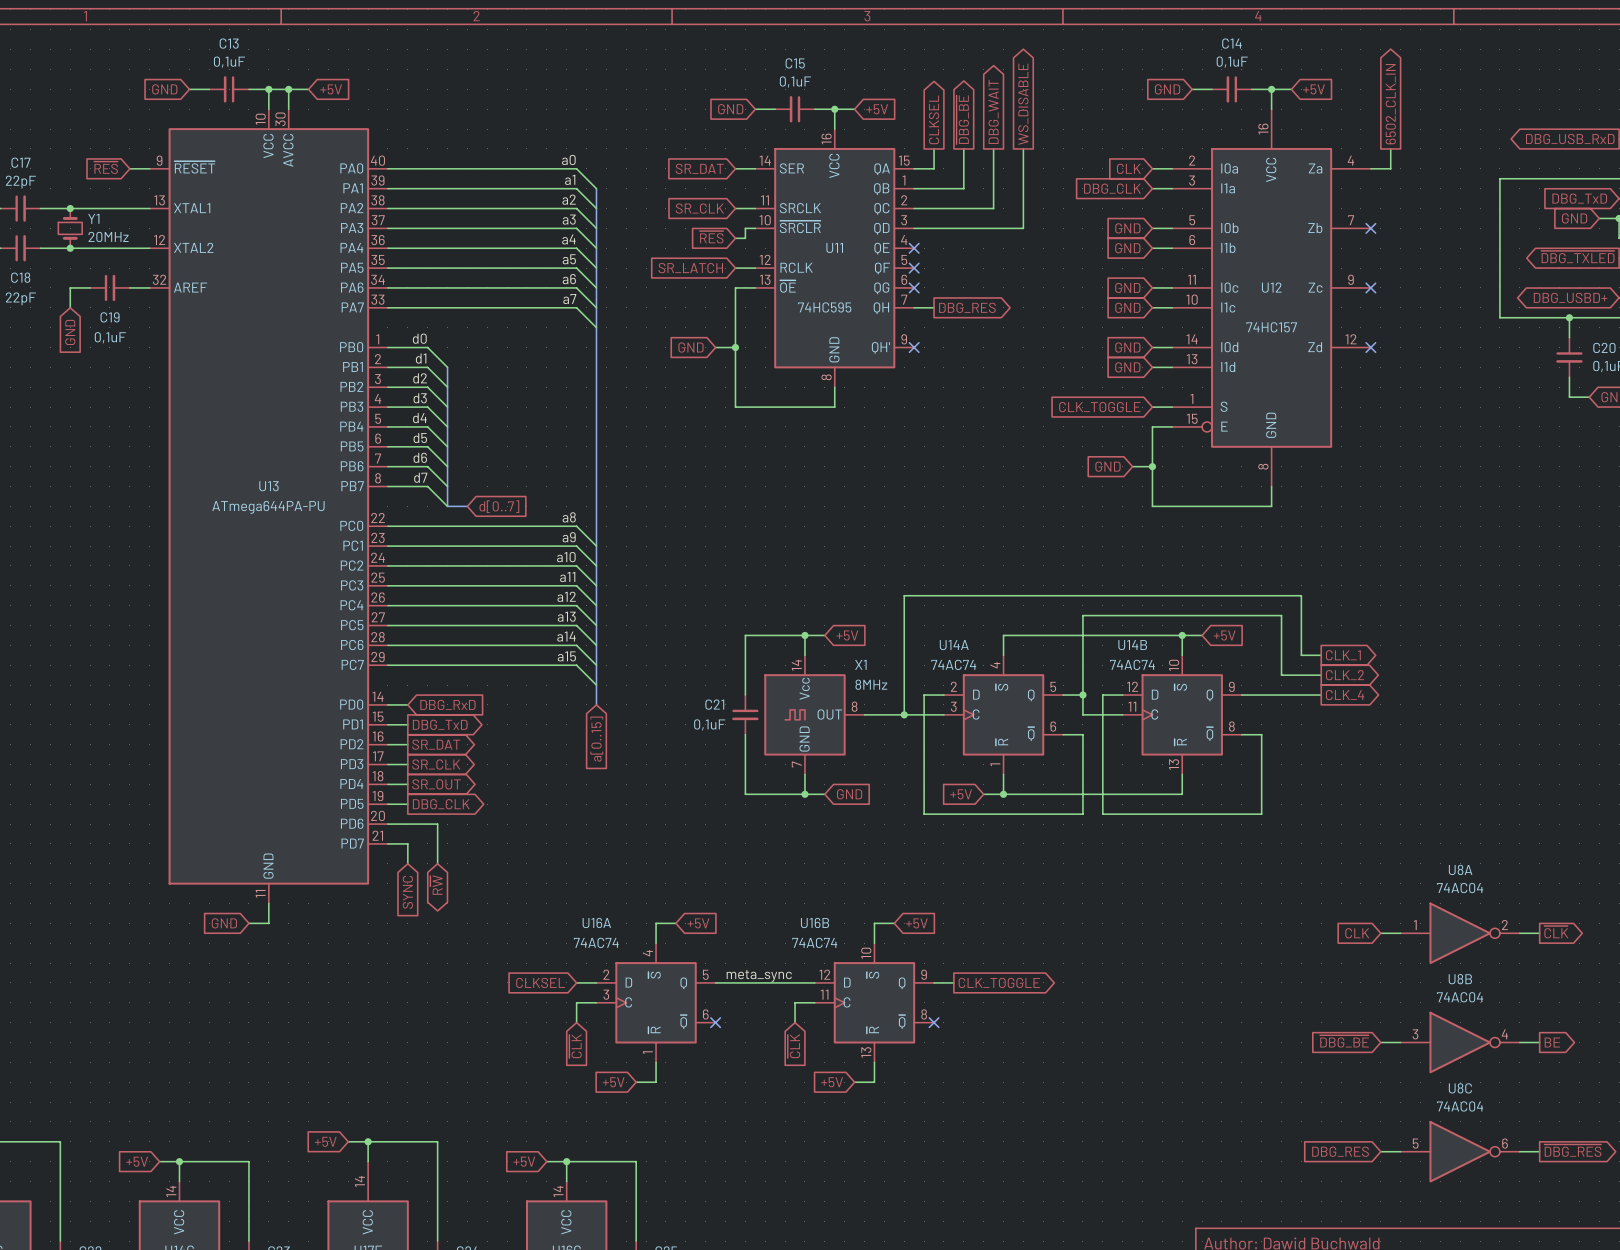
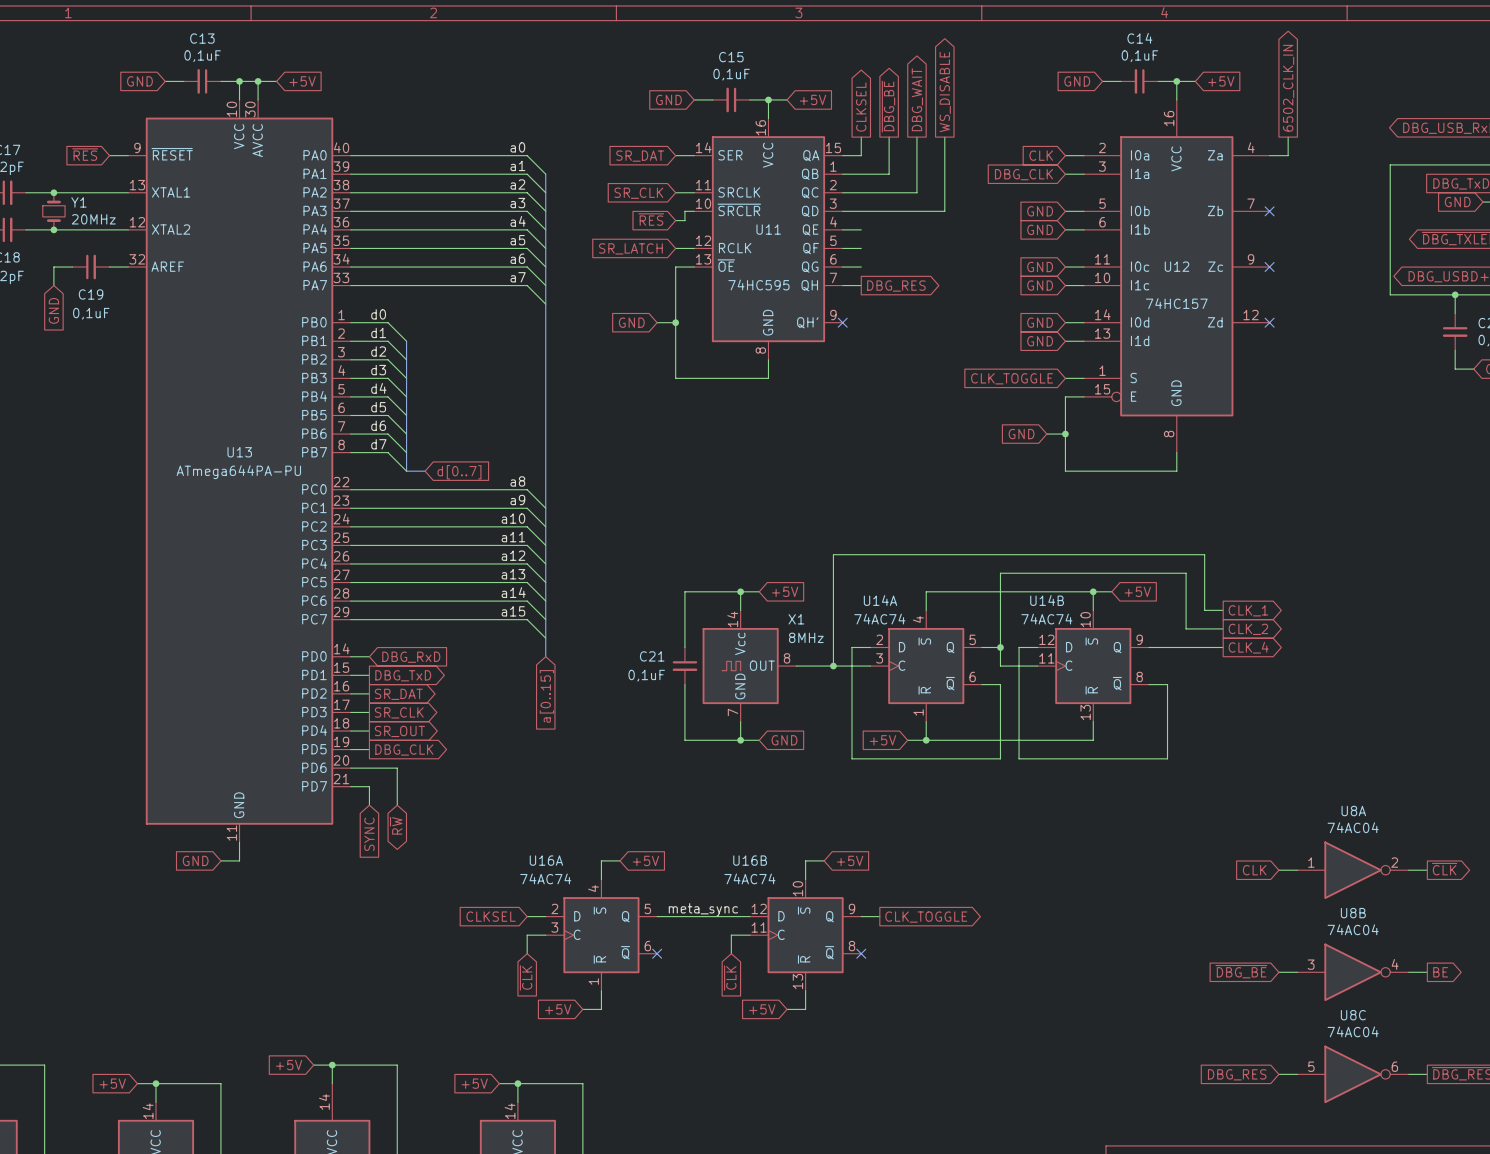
wire: none -> (842, 229) (861, 229)
no-connect mark: (914, 248) -> none
wire: none -> (842, 248) (861, 248)
no-connect mark: (914, 268) -> none
wire: none -> (842, 267) (861, 267)
no-connect mark: (914, 287) -> none

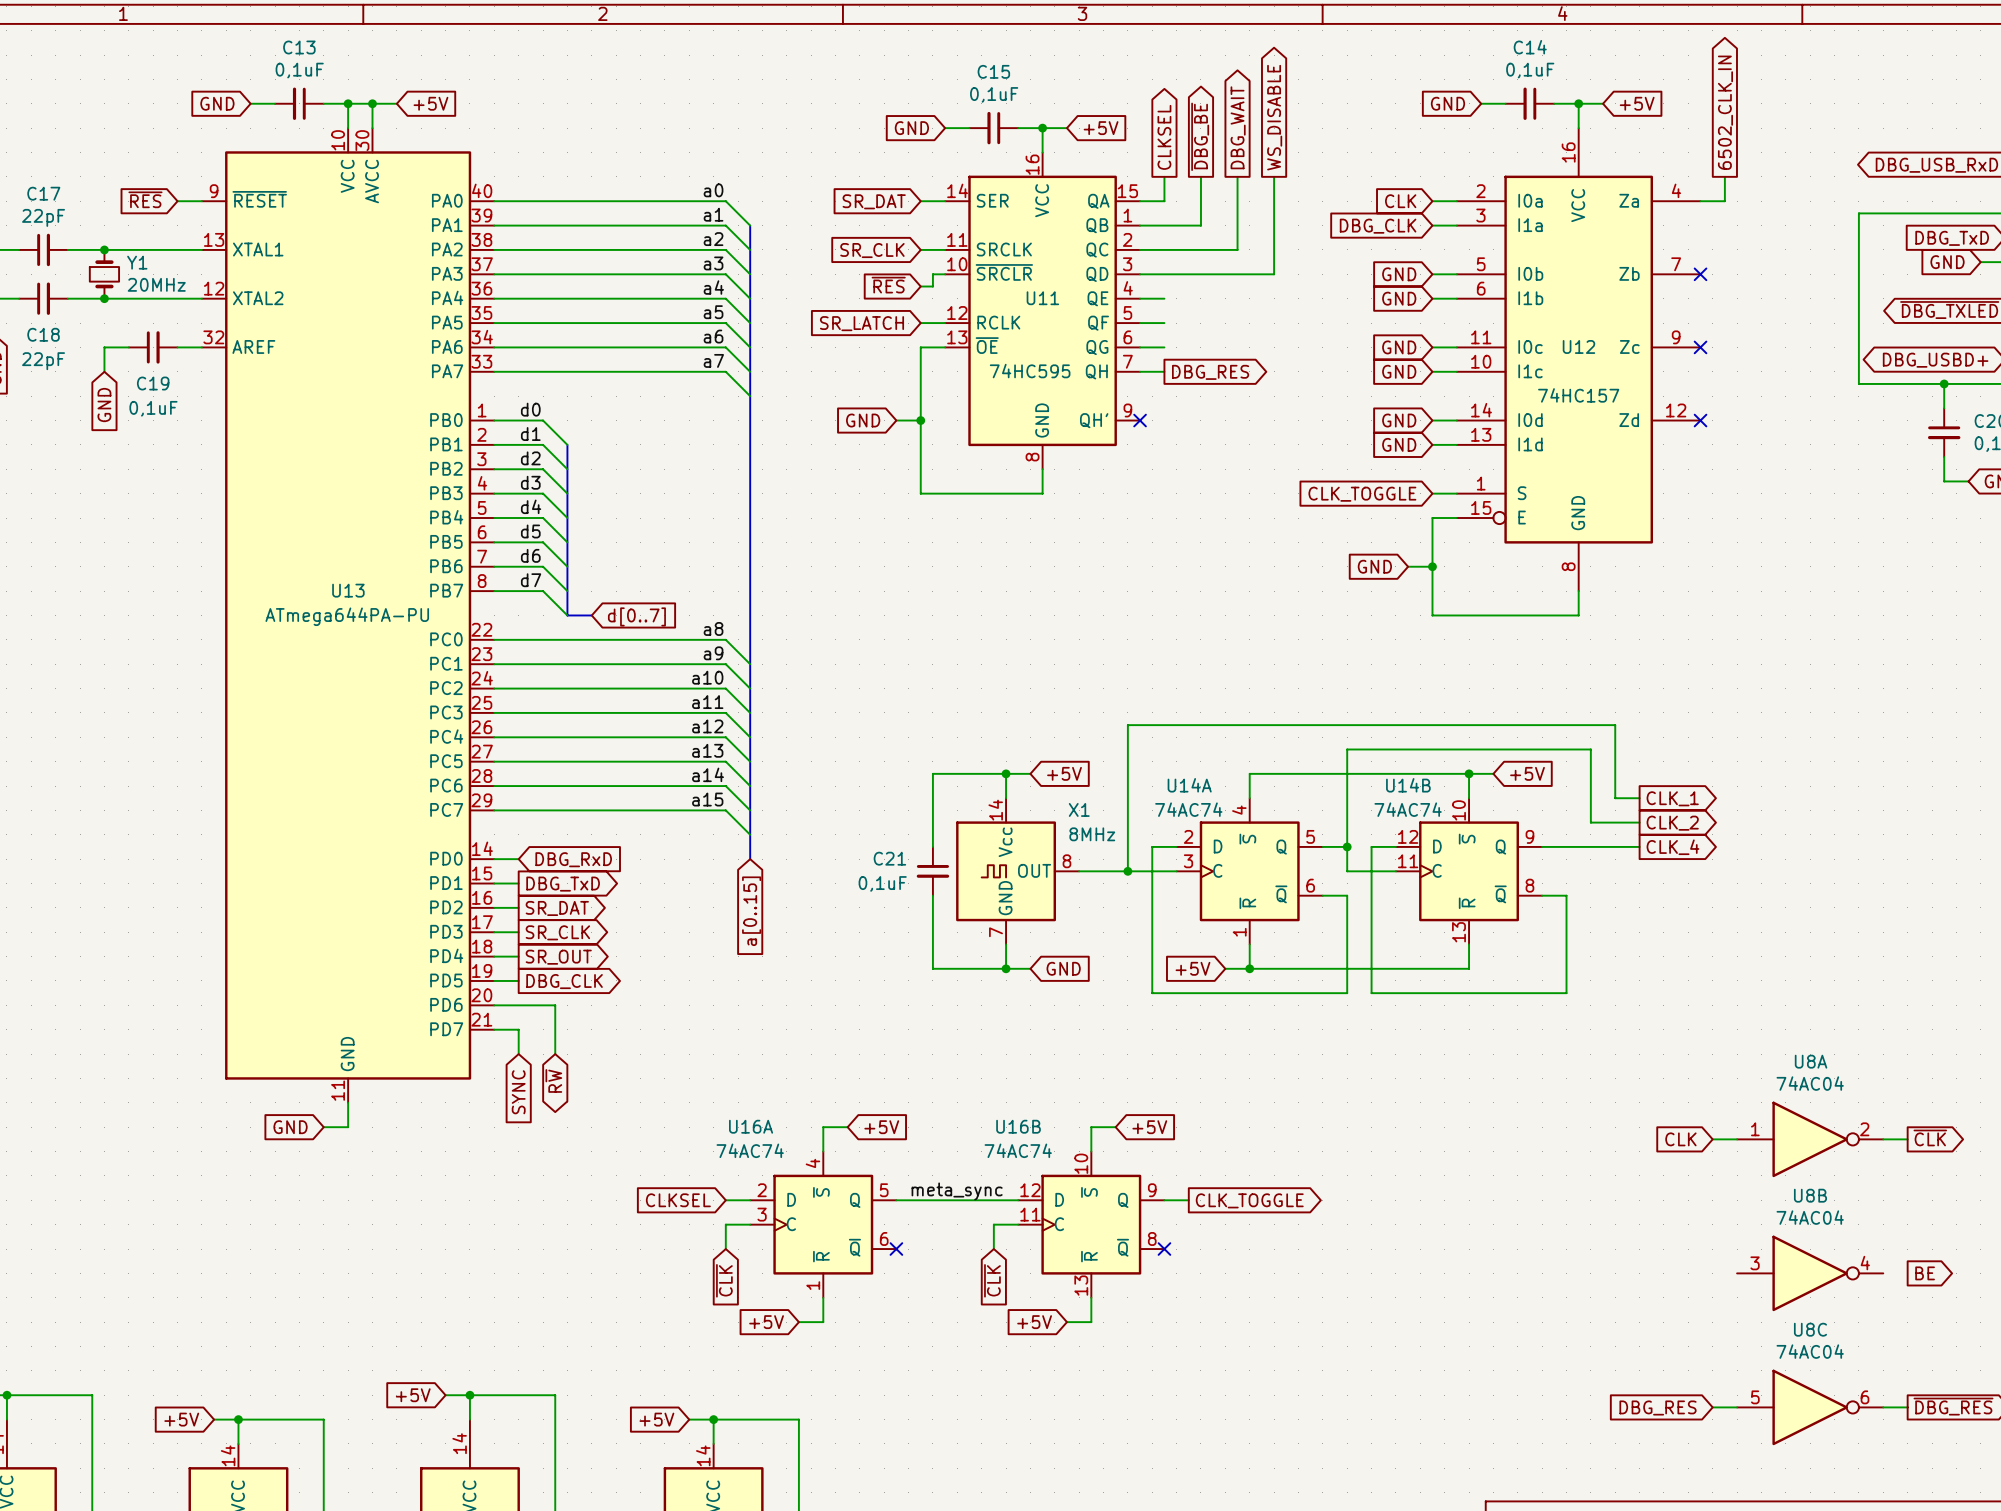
global label: ~{DBG_BE} (1241, 971) -> none
wire: (1278, 972) (1297, 972) -> none
wire: (1408, 972) (1427, 972) -> none

